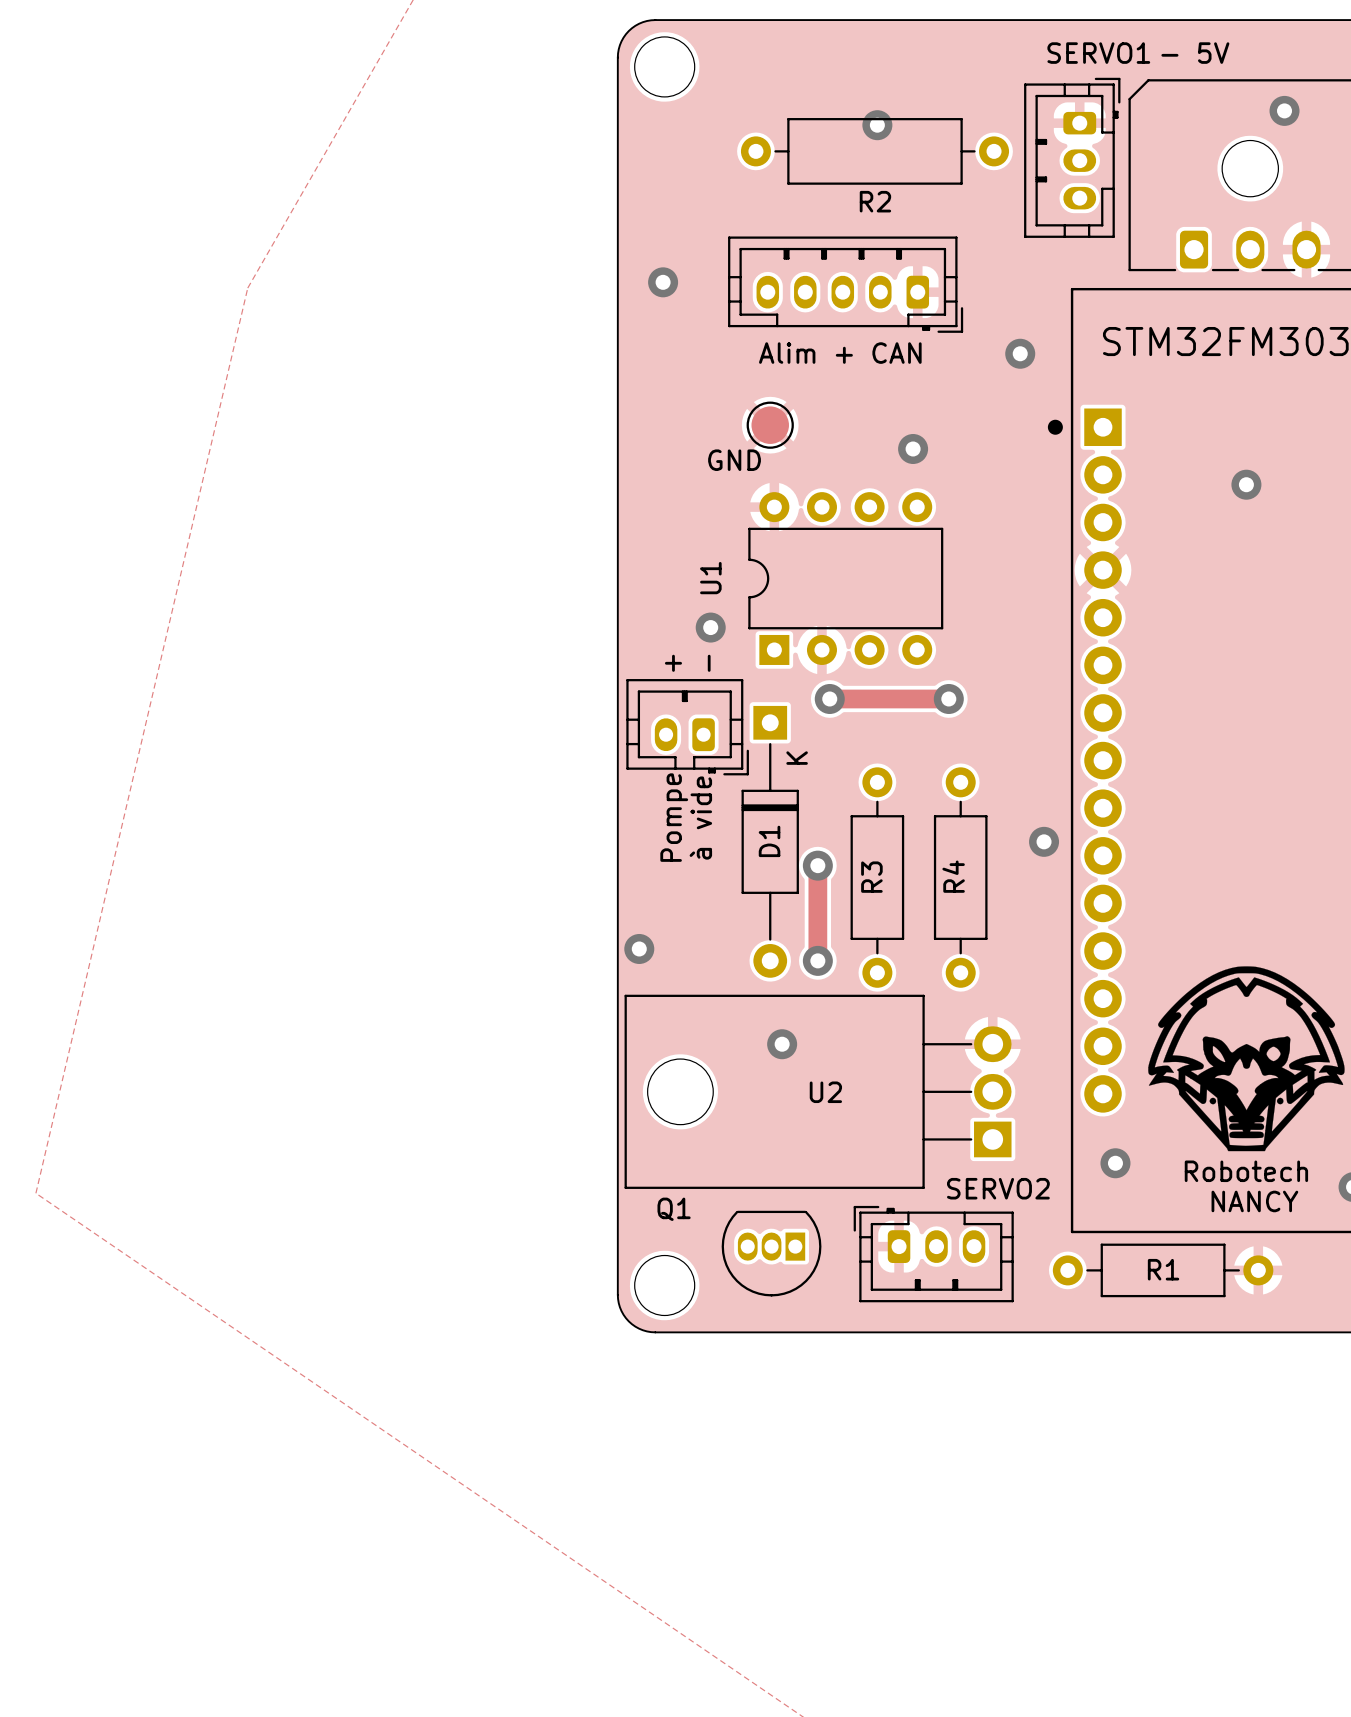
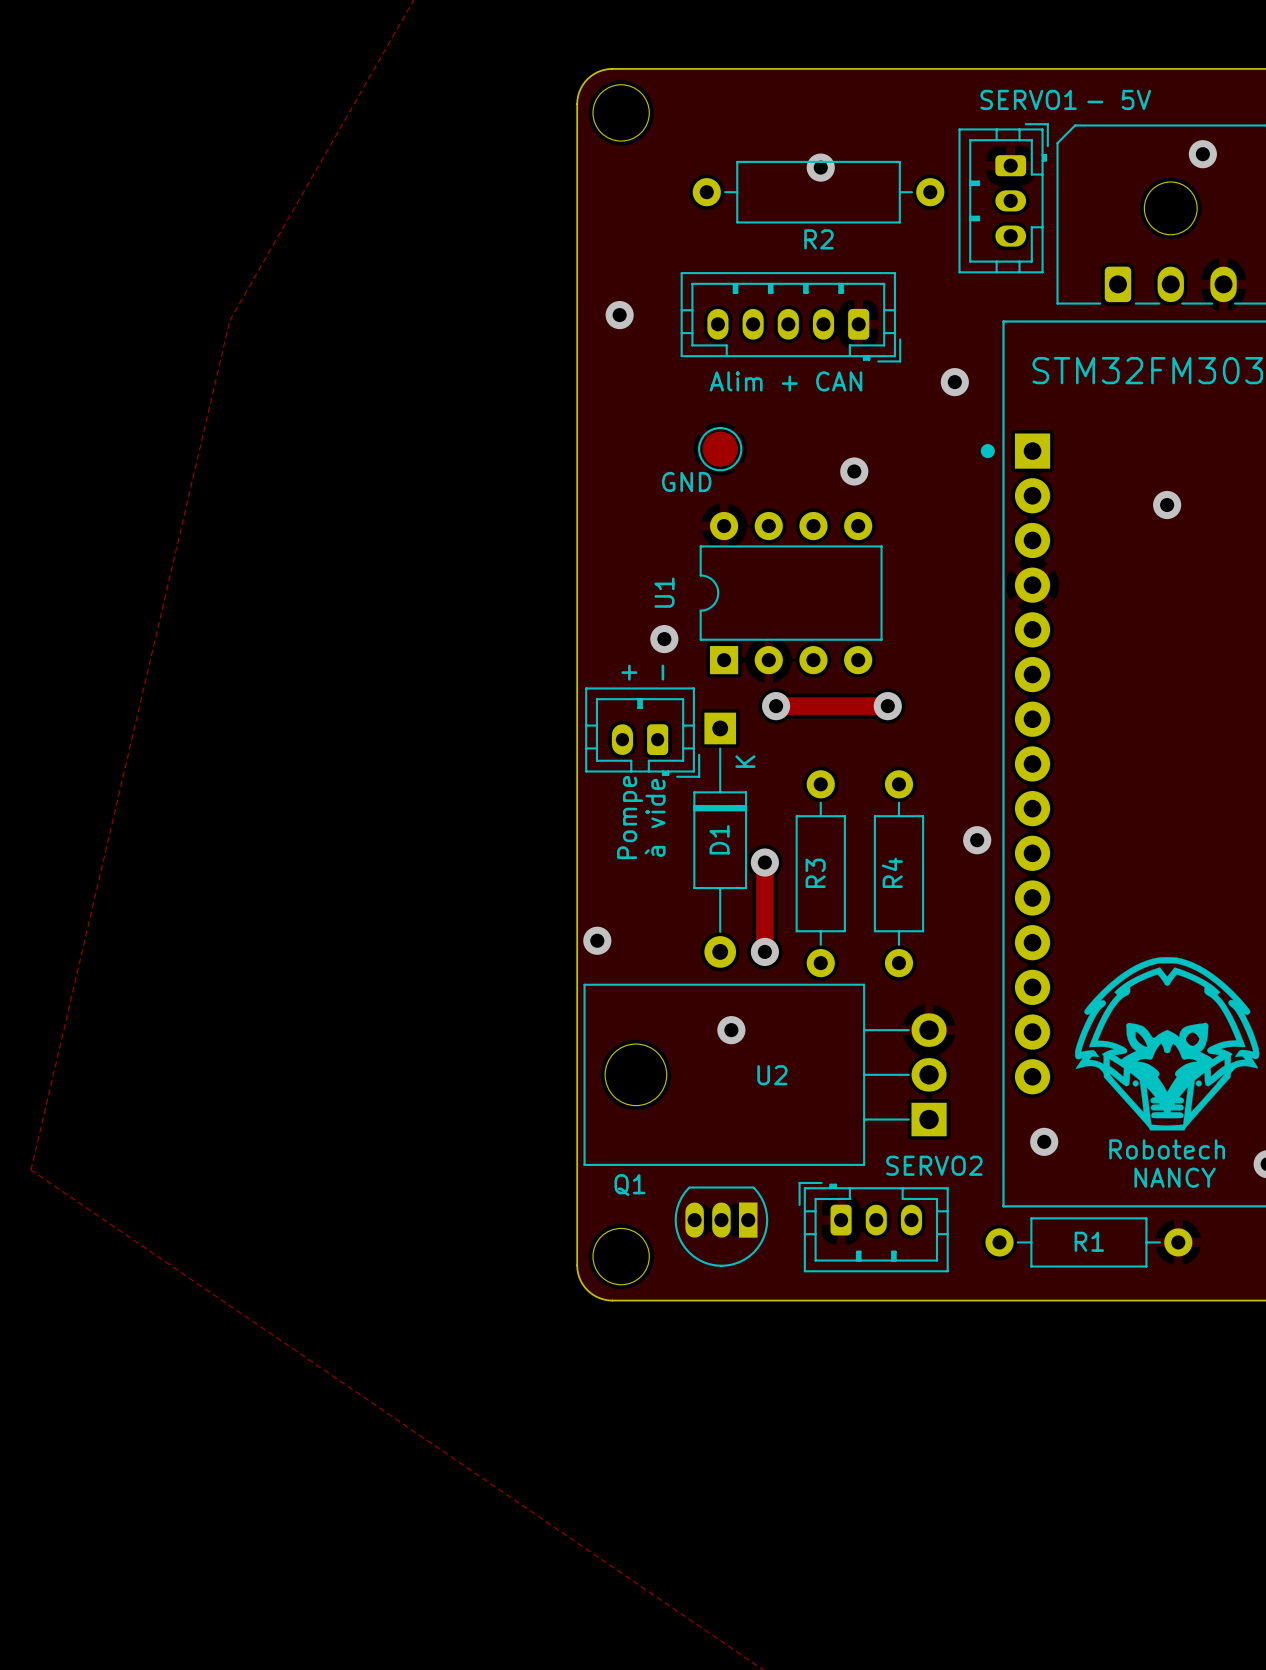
Q1 footprint: [721, 1210, 822, 1297] -> [674, 1186, 769, 1267]

